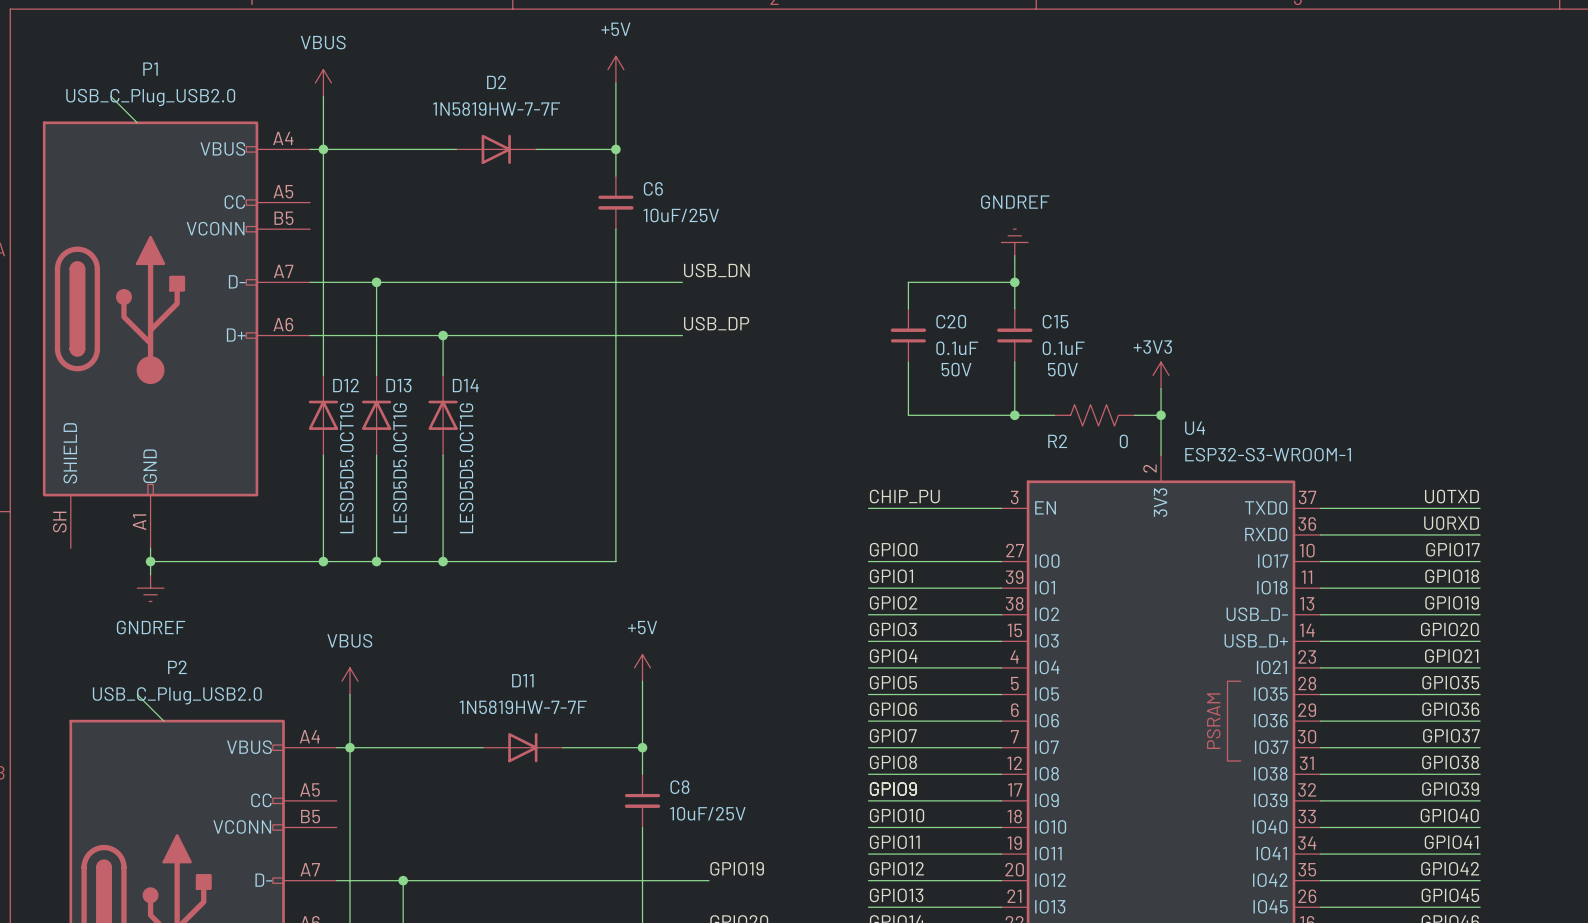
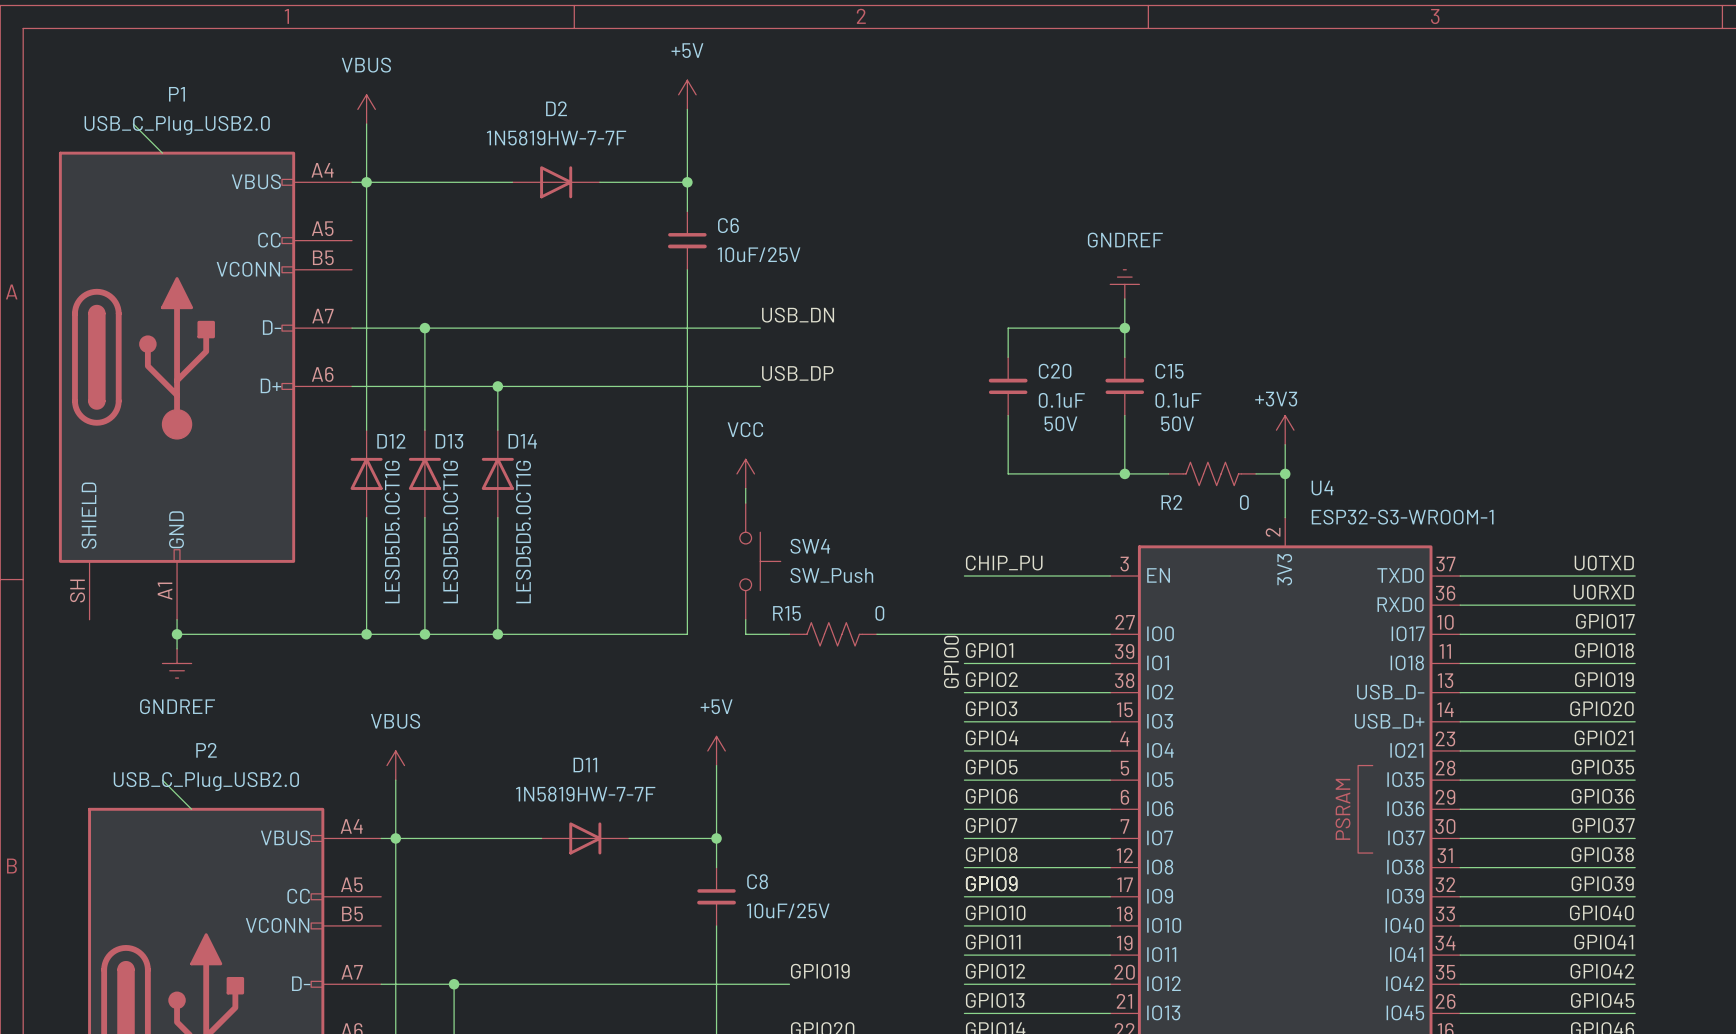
power symbol: none -> VCC (745, 473)
wire: none -> (745, 488) (745, 503)
SW4: none -> SW_Push (760, 561)
wire: none -> (745, 619) (745, 634) (789, 634)
label rotation: 0° (893, 549) -> 90° counterclockwise (951, 661)
R15: none -> 0 (833, 634)
wire: none -> (876, 634) (964, 634)

